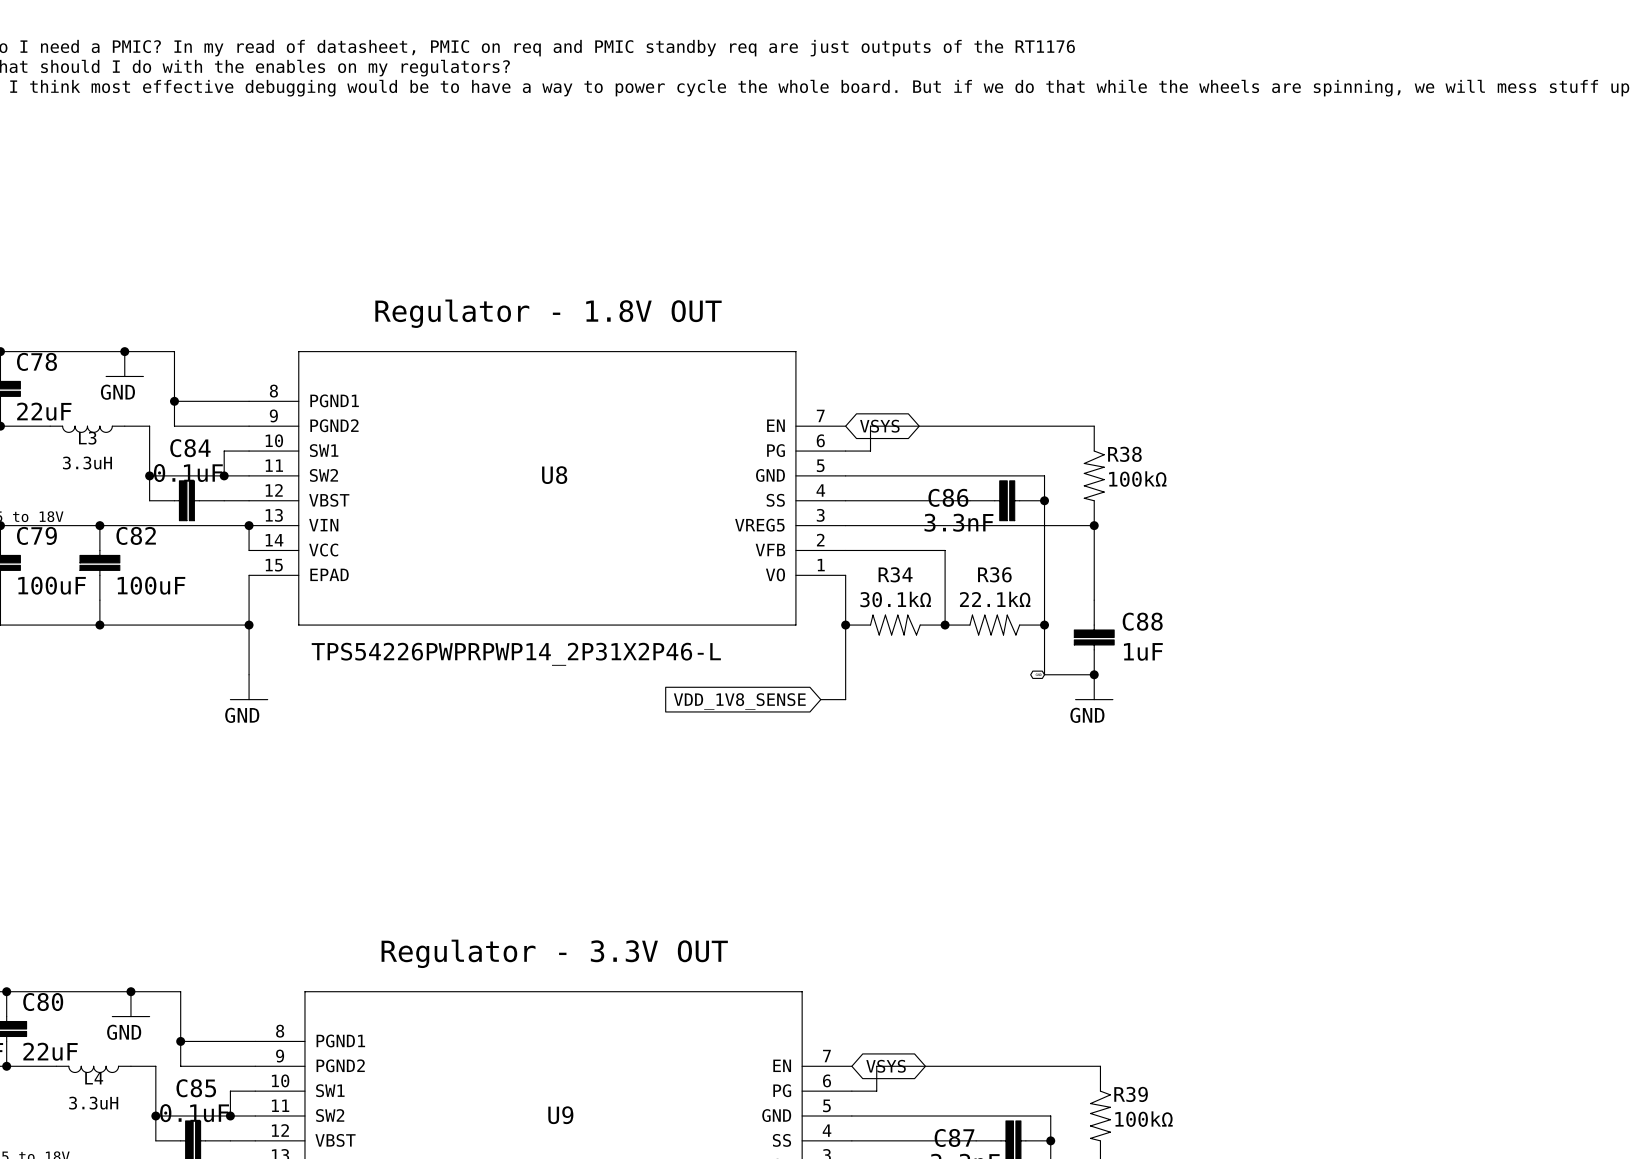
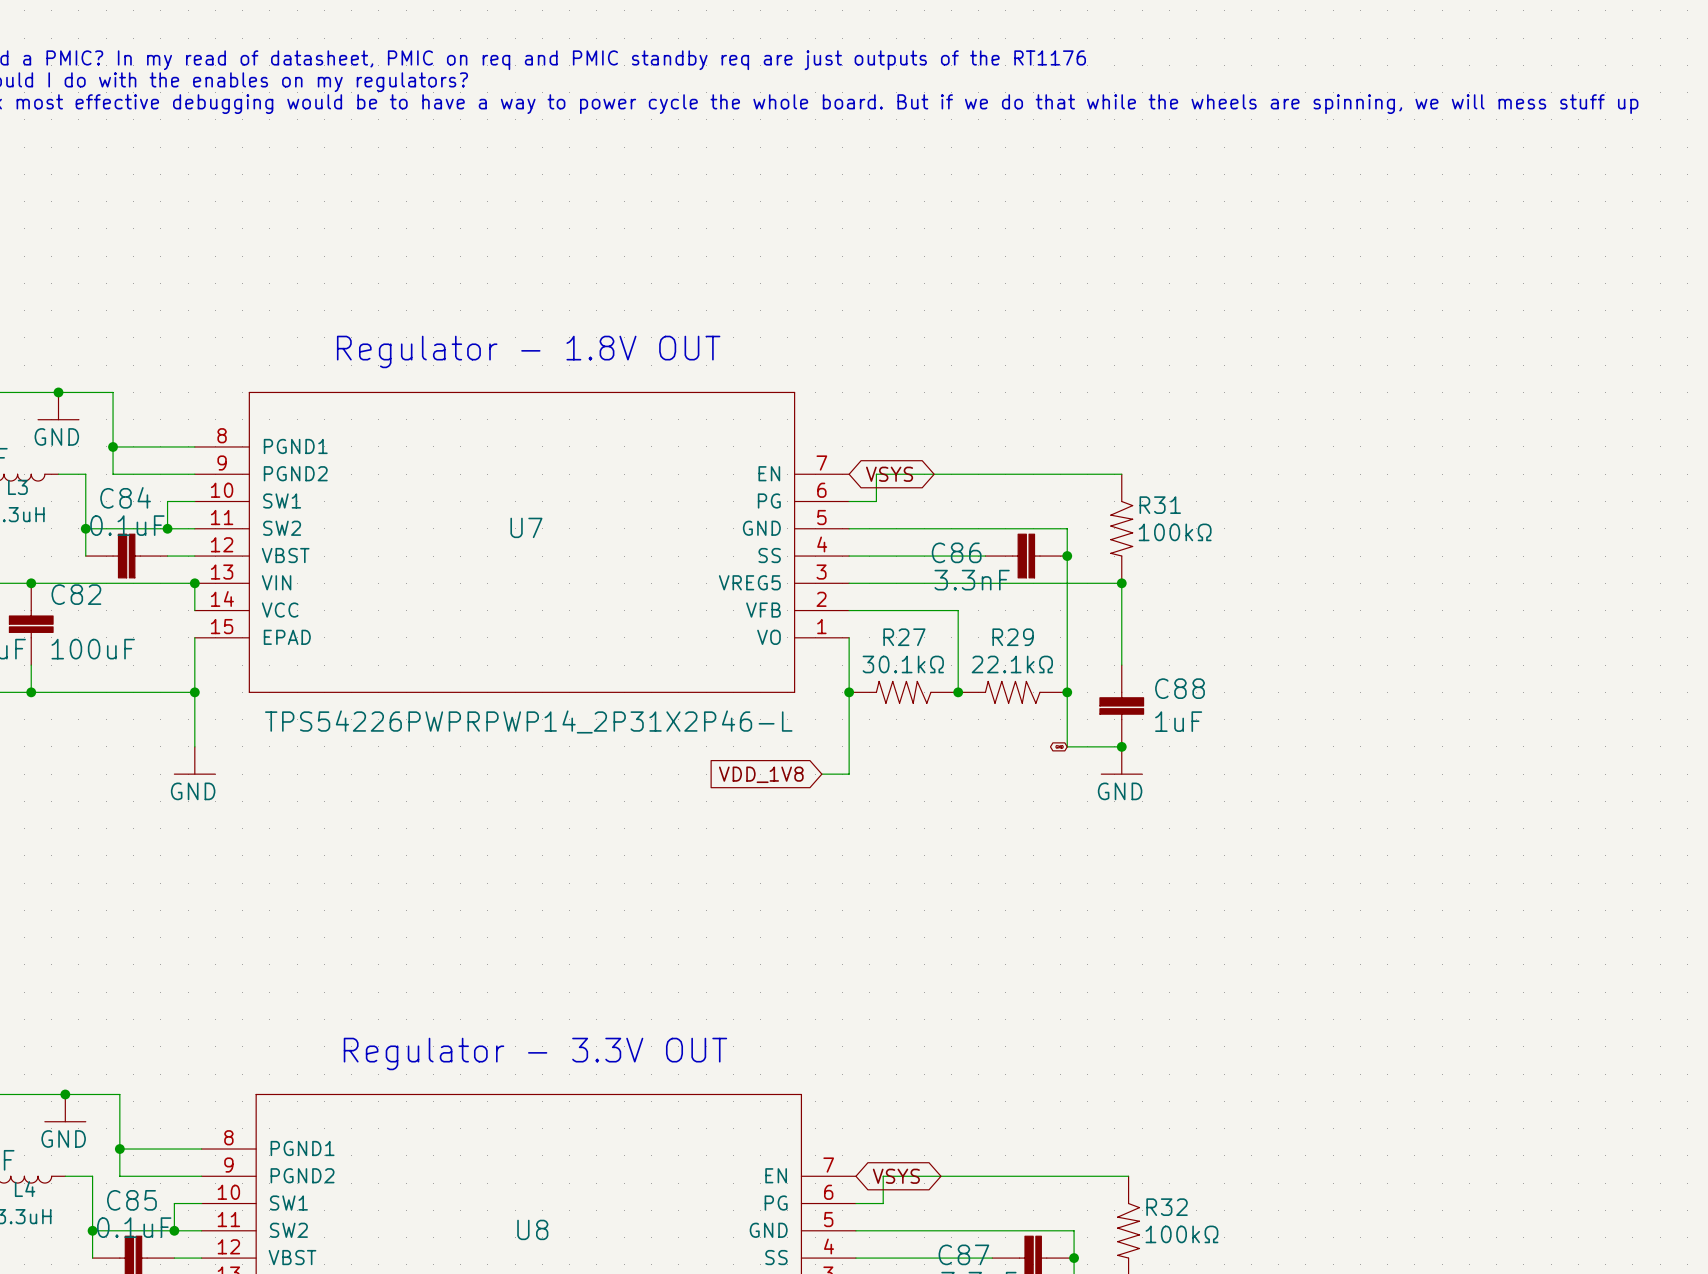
R38 name: R38 (1124, 454) -> R31 (1160, 505)
U8 name: U8 (554, 475) -> U7 (526, 527)
R34 name: R34 (895, 574) -> R27 (904, 637)
R36 name: R36 (994, 574) -> R29 (1013, 637)
global label: VDD_1V8_SENSE (739, 701) -> VDD_1V8 (761, 774)
R39 name: R39 (1131, 1094) -> R32 (1167, 1207)
U9 name: U9 (560, 1115) -> U8 (532, 1229)

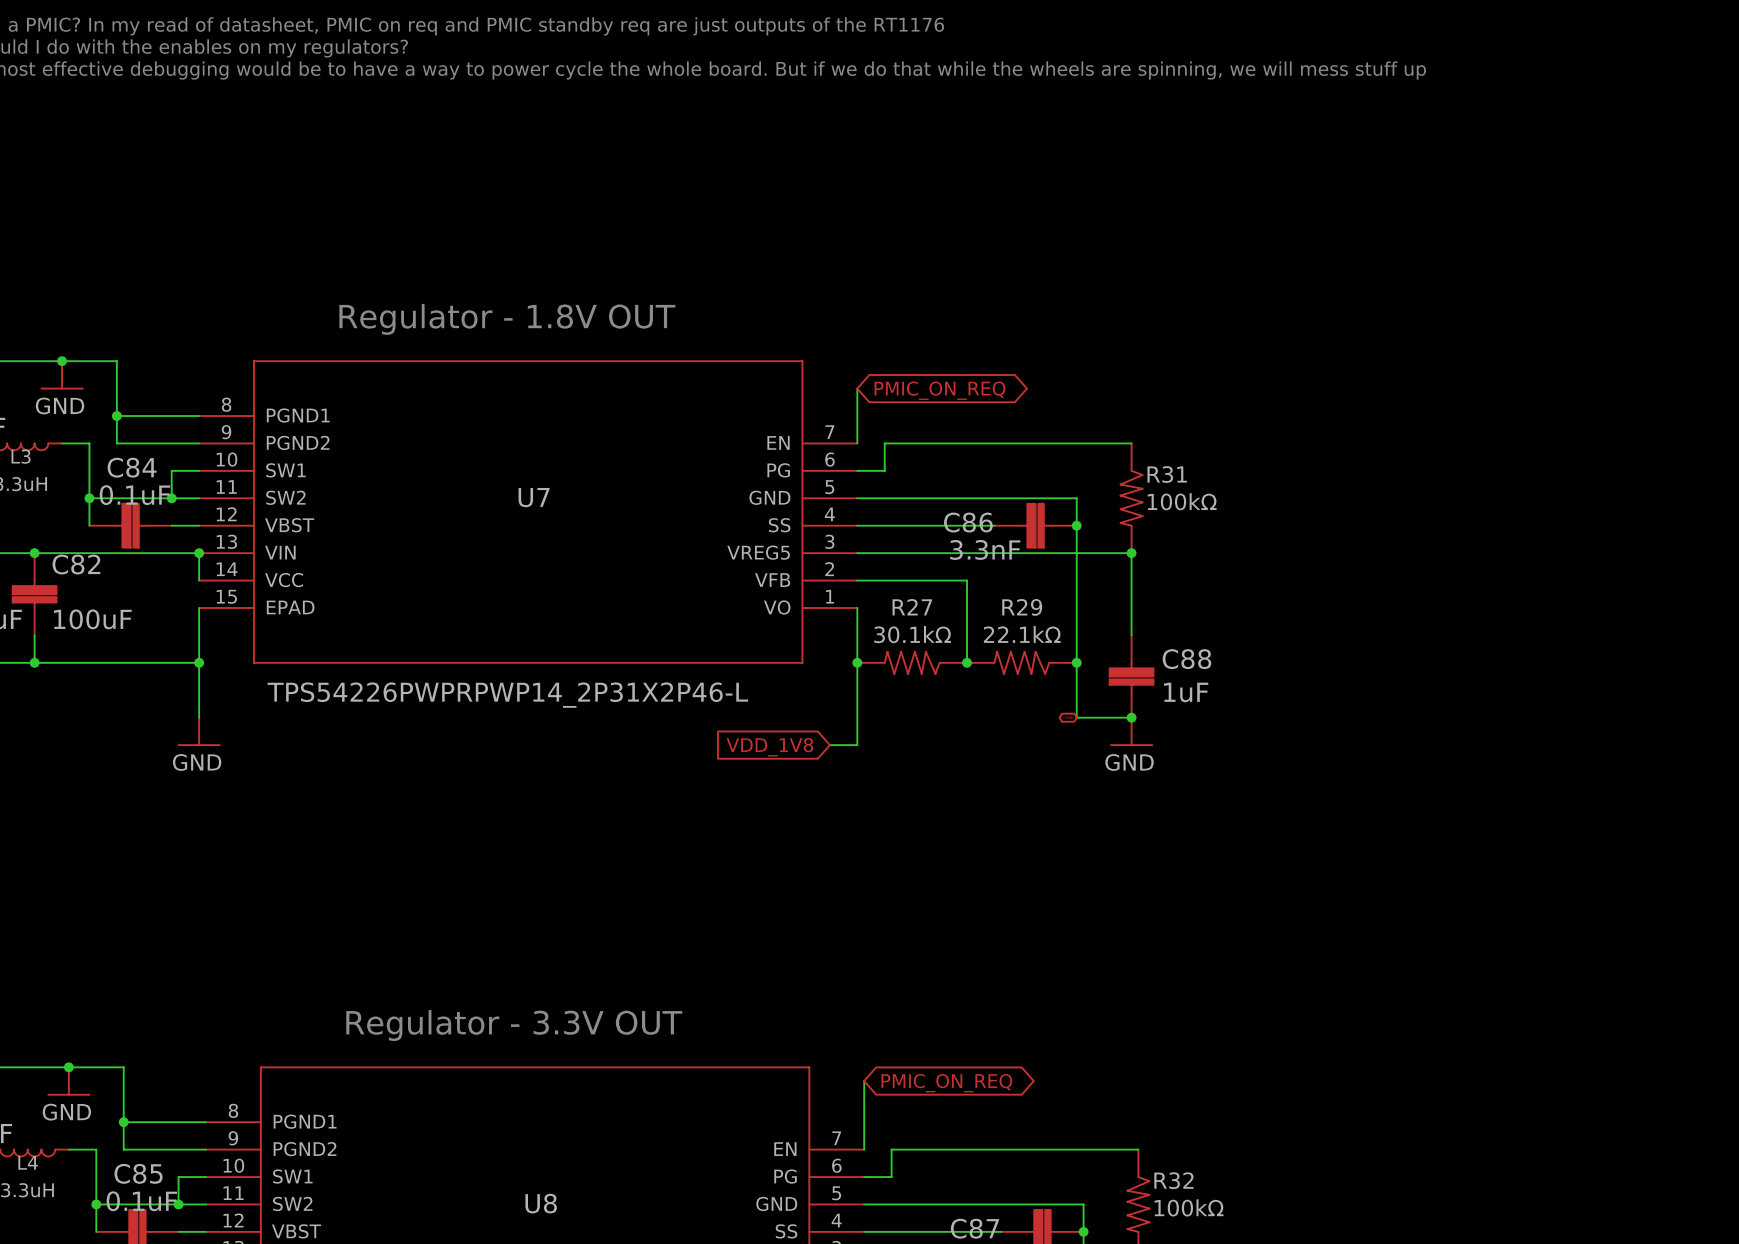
wire: none -> (857, 388) (857, 443)
global label: none -> PMIC_ON_REQ (939, 390)
global label: VSYS (889, 474) -> none
wire: none -> (864, 1081) (864, 1149)
global label: none -> PMIC_ON_REQ (946, 1083)
global label: VSYS (896, 1176) -> none

